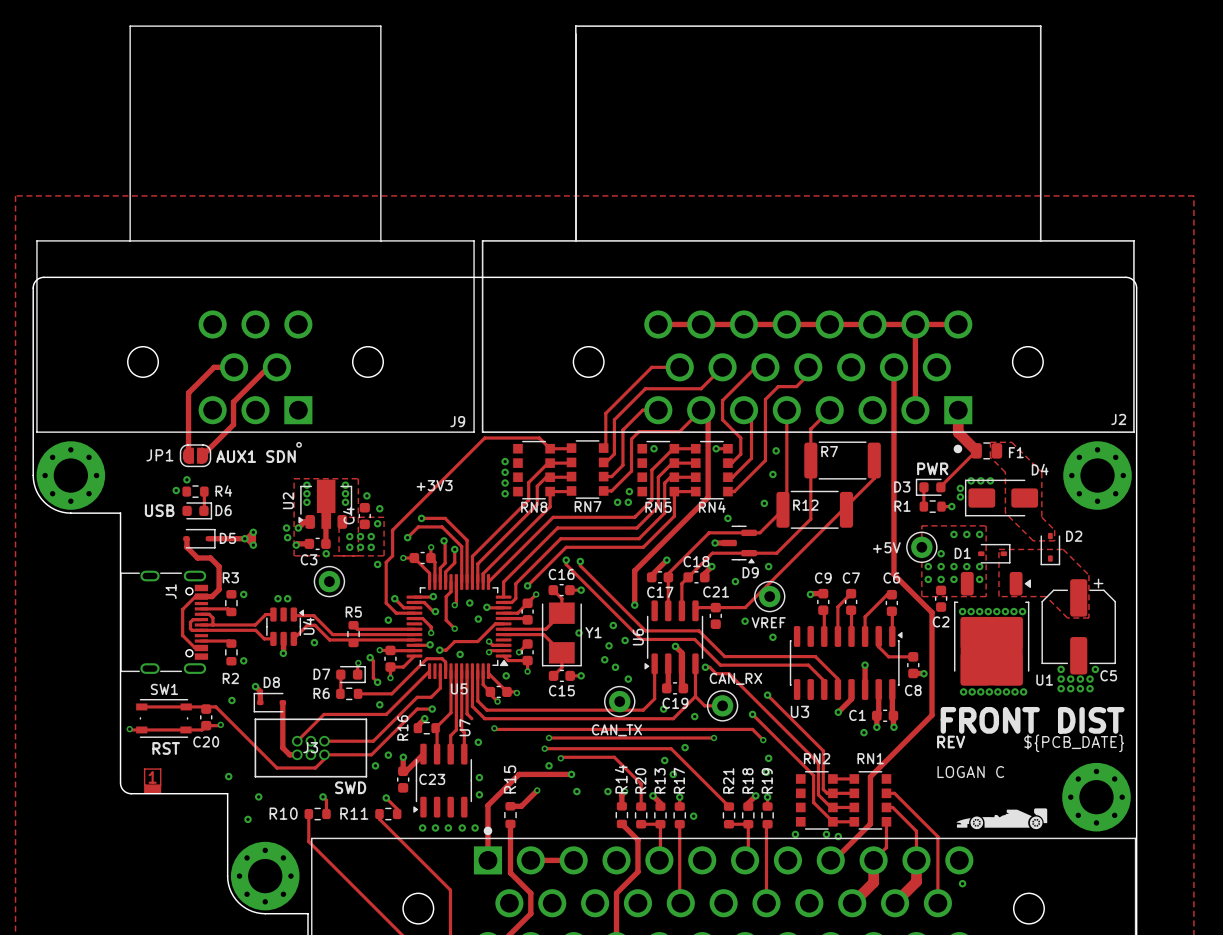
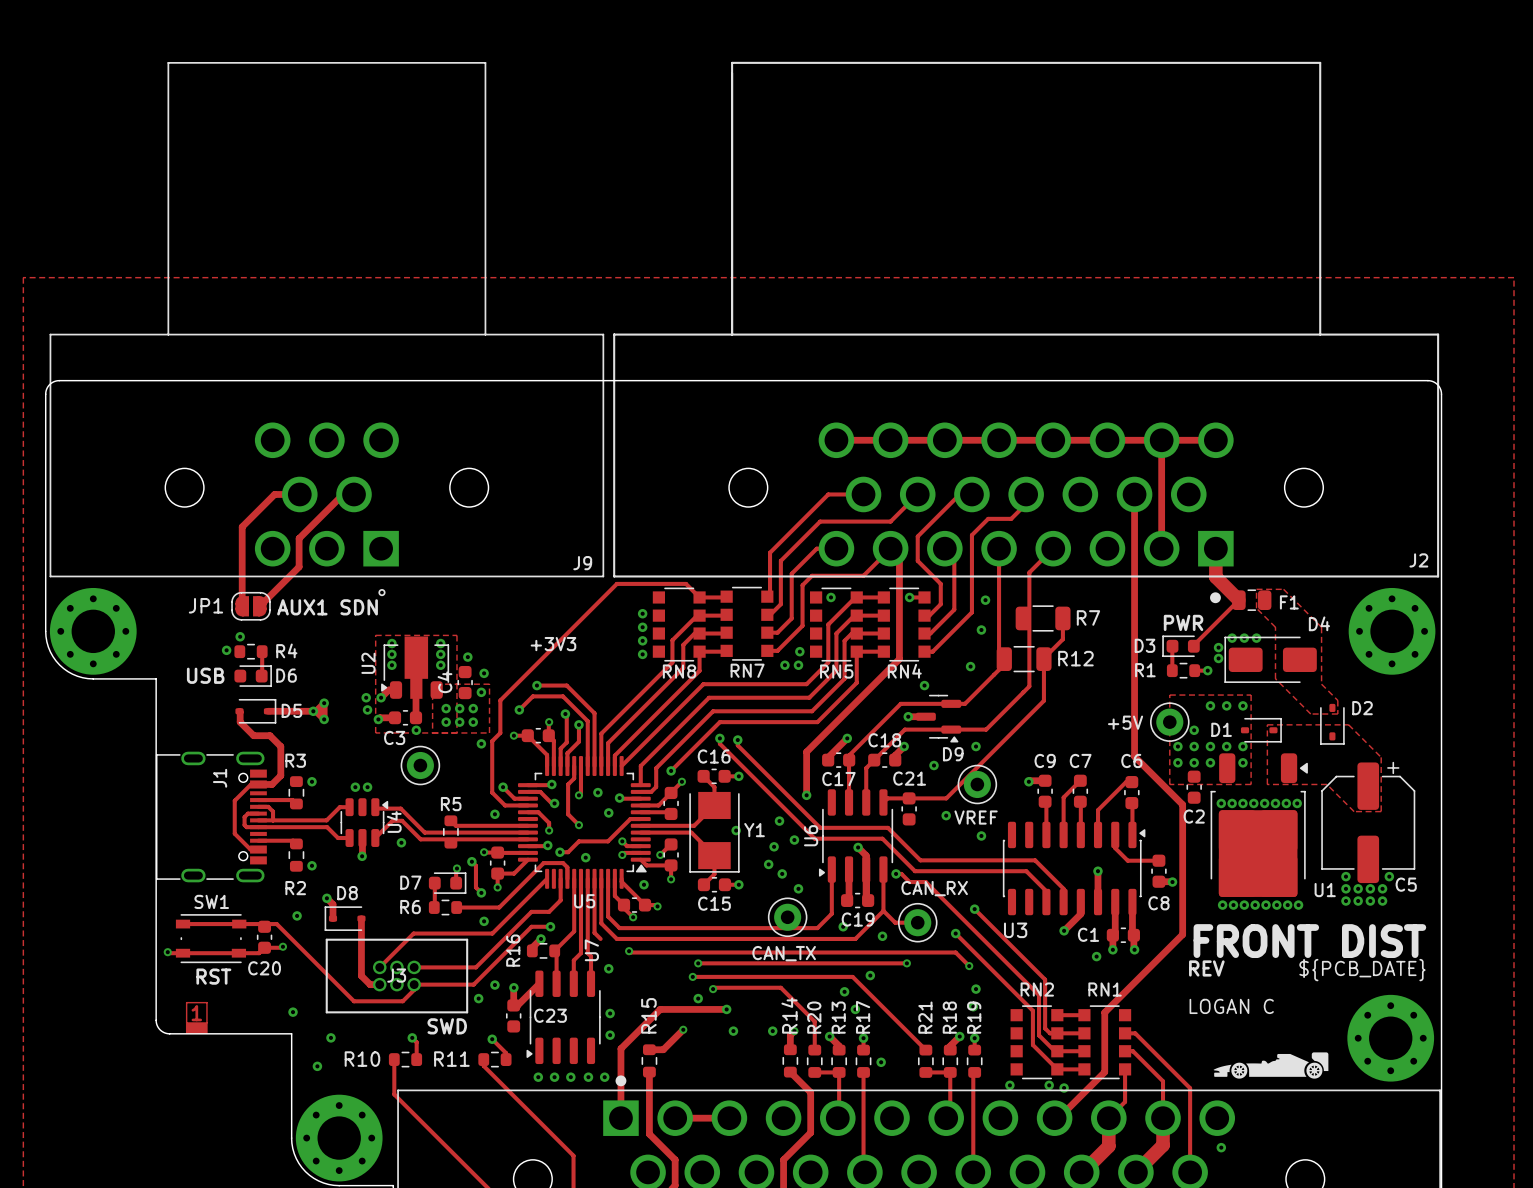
R7 footprint: [804, 441, 881, 480] -> [1015, 605, 1071, 632]
R7 name position: R7 (829, 451) -> R7 (1088, 617)
track: (874, 460) (874, 478) (822, 530) -> (1062, 618) (1062, 639) (1043, 658) (1043, 700)
R12 footprint: [776, 490, 854, 529] -> [996, 645, 1052, 673]
R12 name position: R12 (805, 505) -> R12 (1075, 658)

